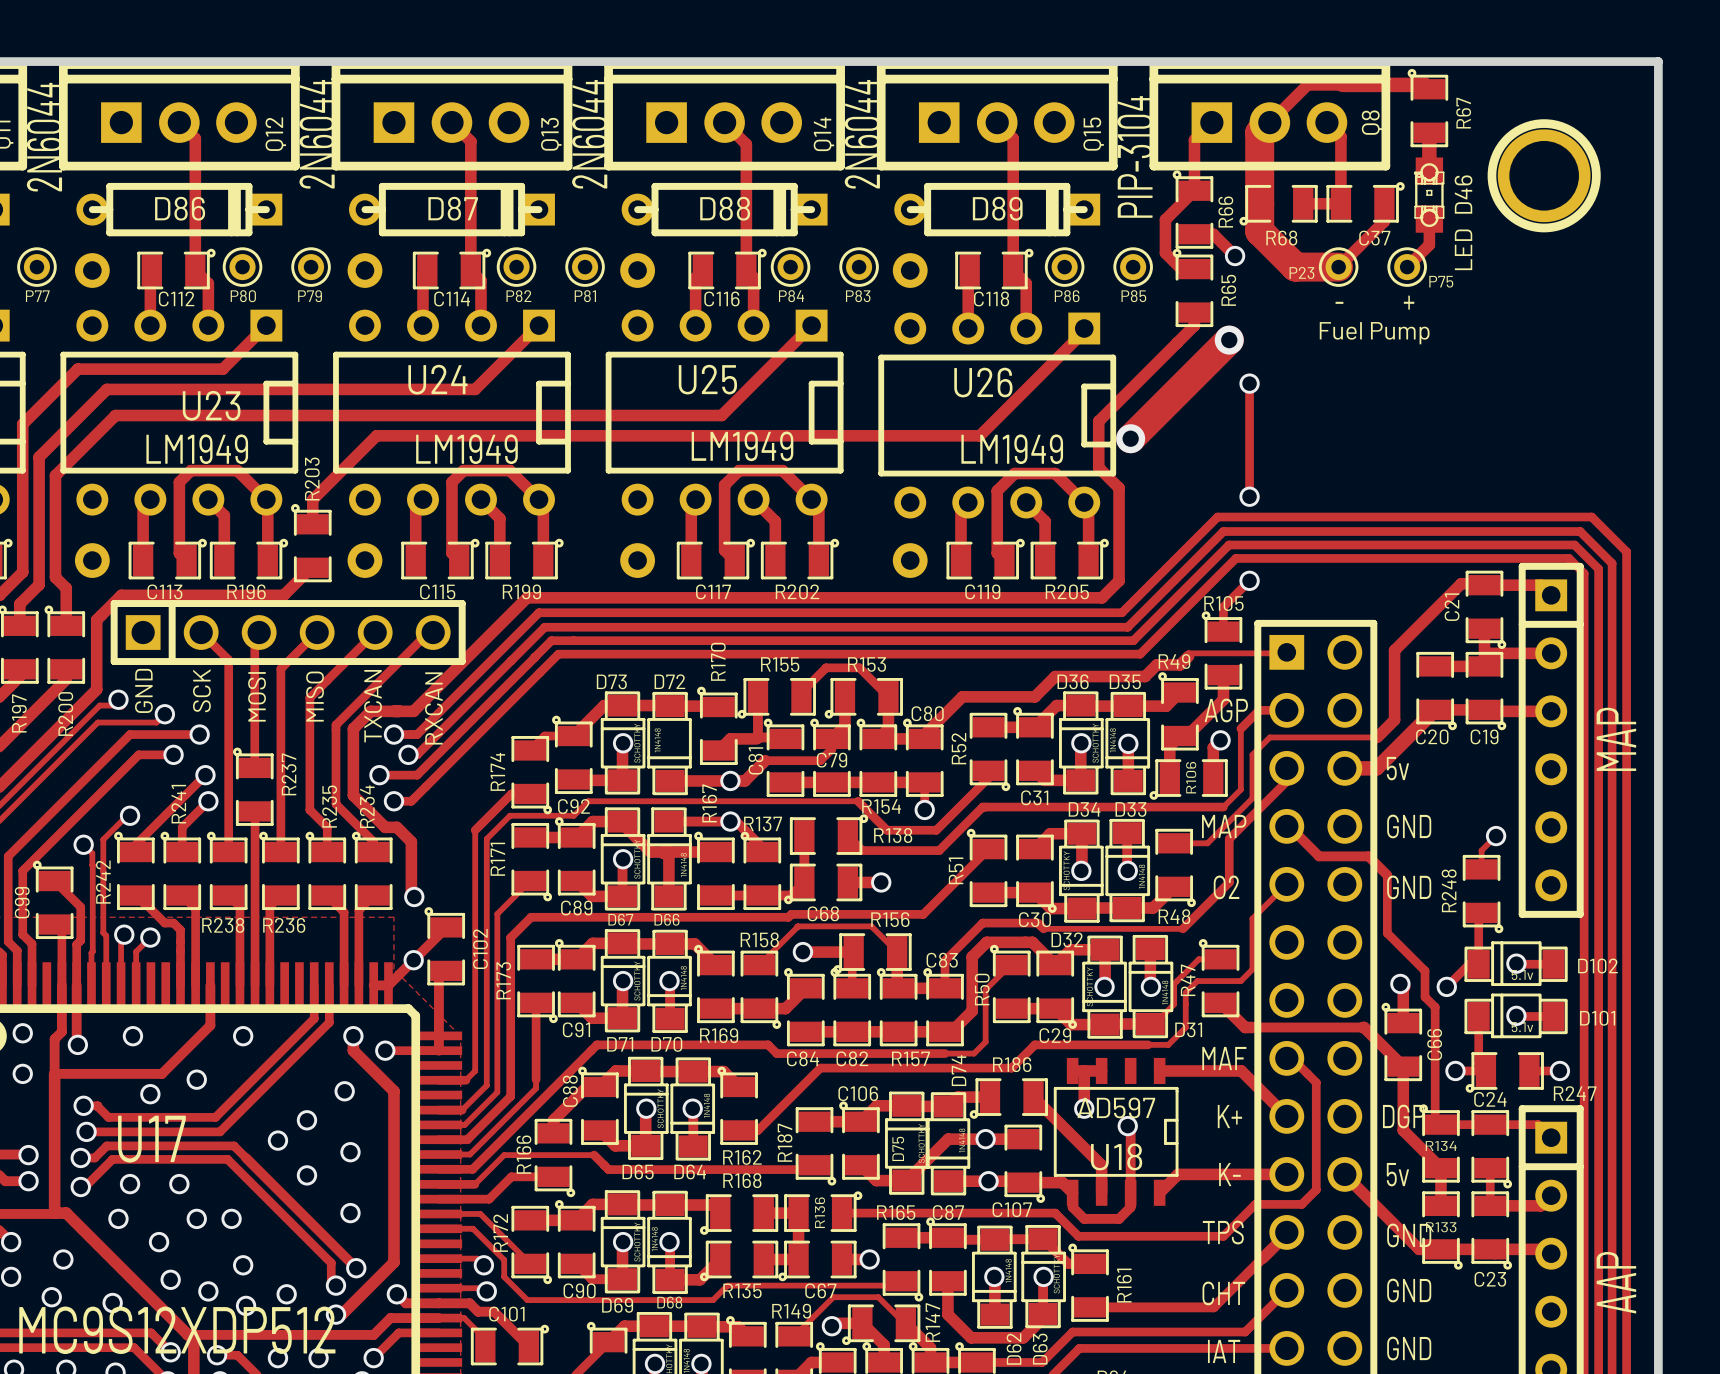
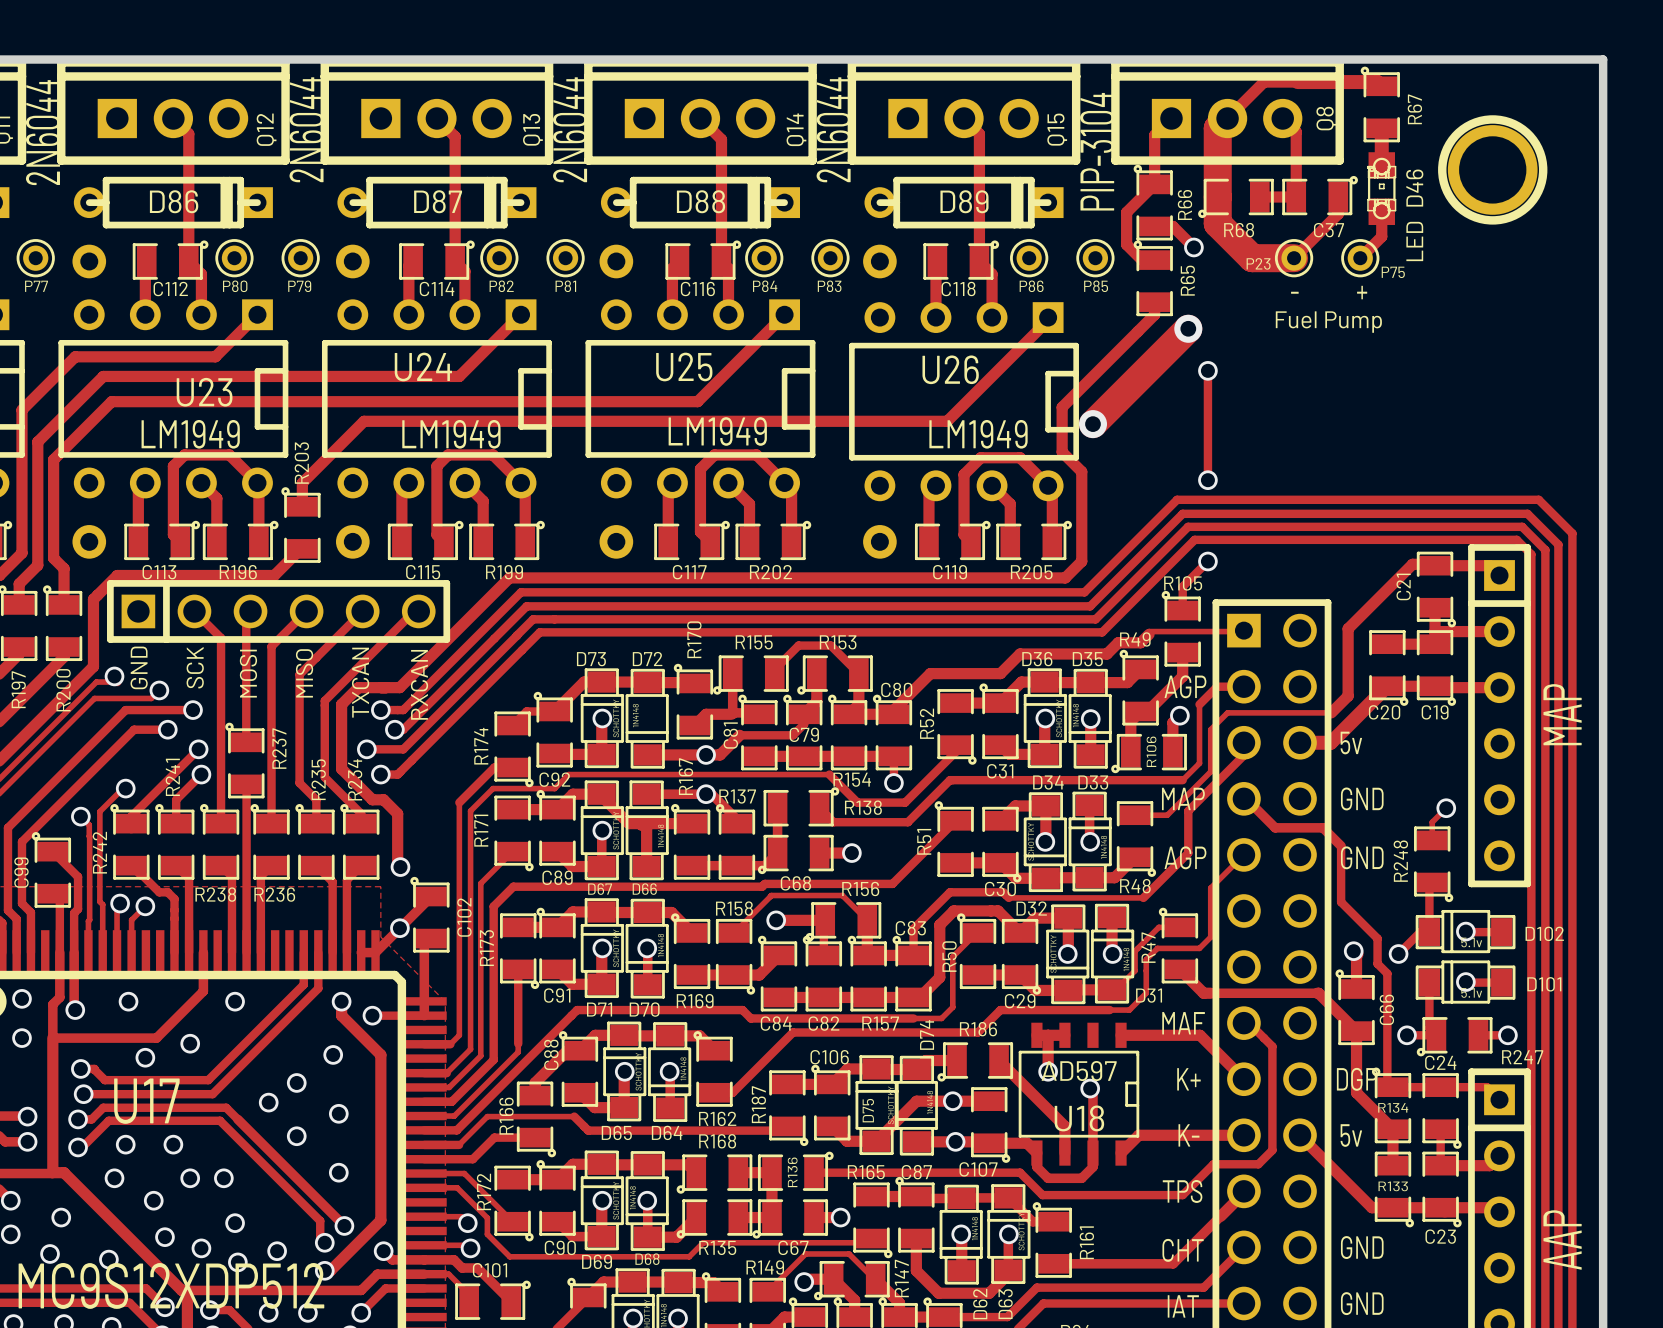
text: O2 (1226, 887) -> AGP (1185, 857)
text: GND (1409, 1235) -> none

